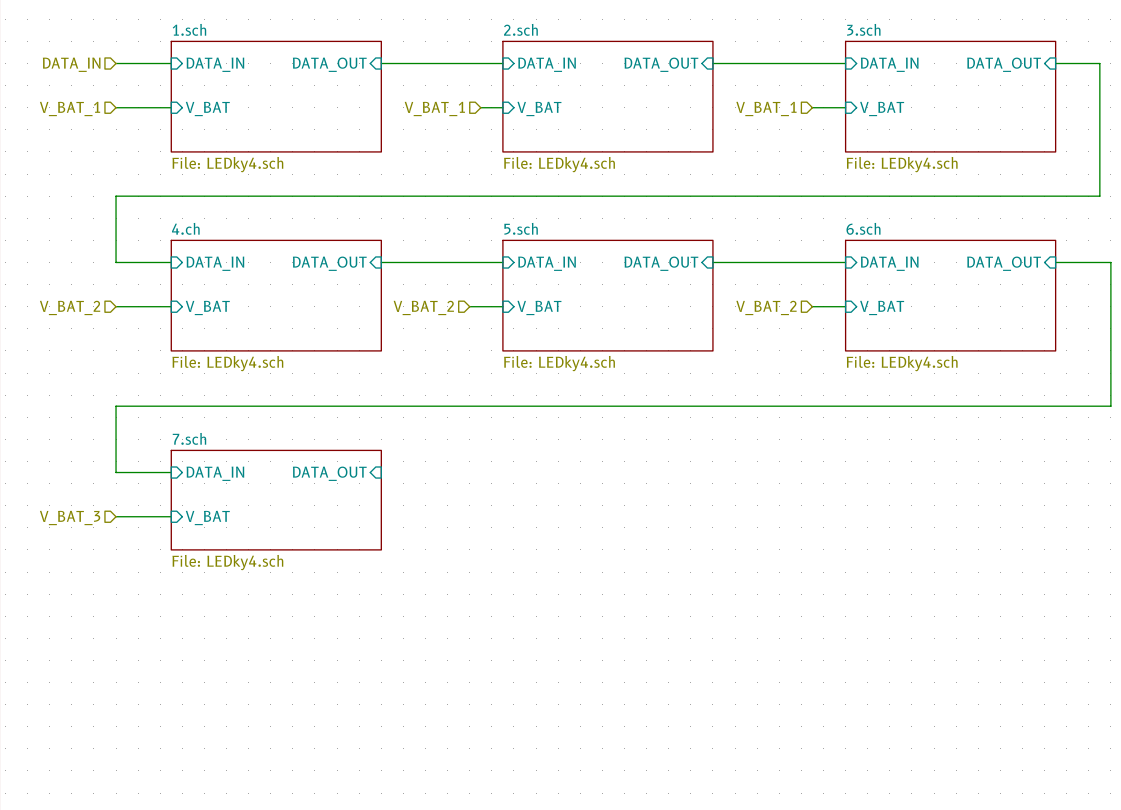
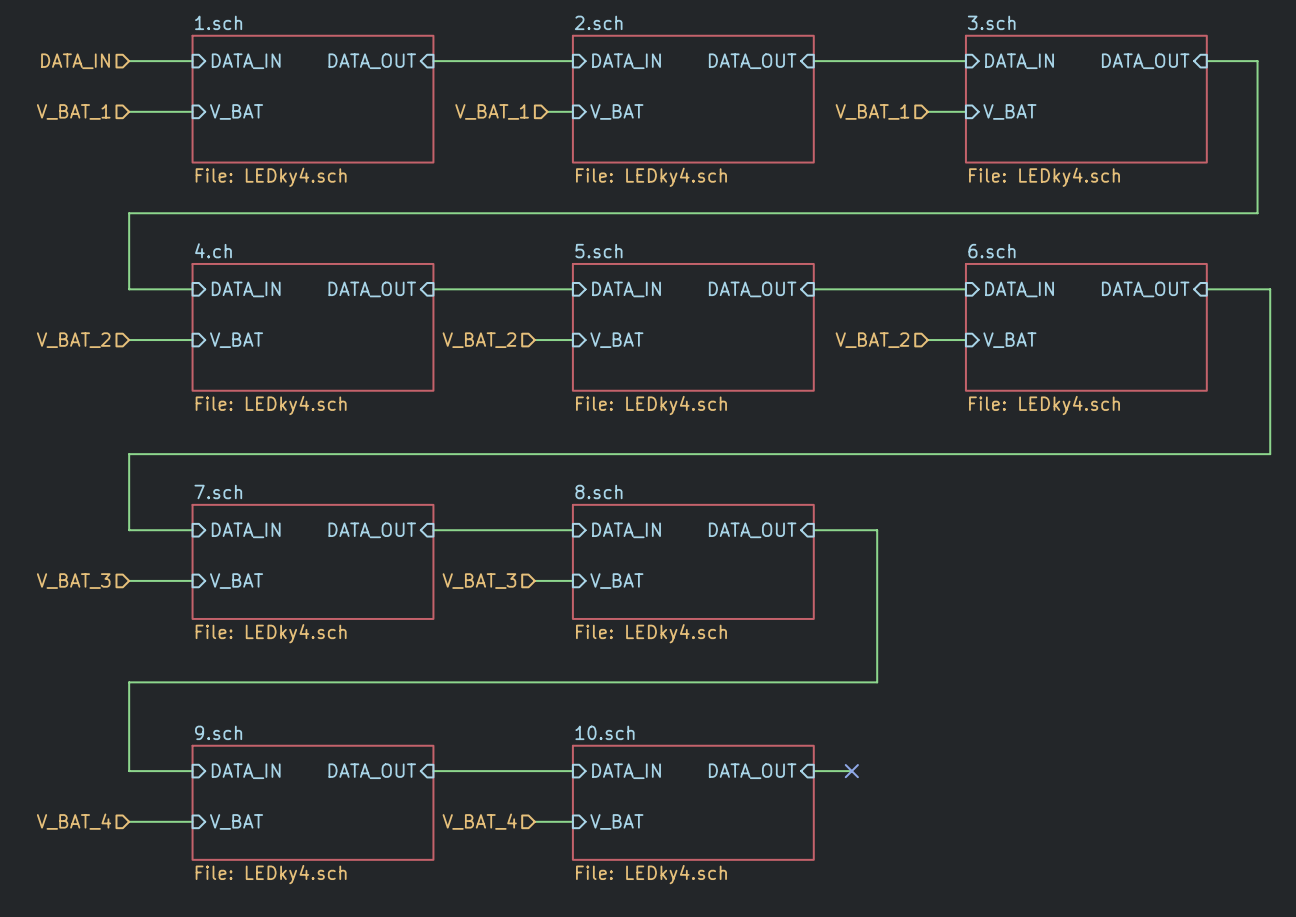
wire: none -> (433, 530) (572, 530)
wire: none -> (813, 530) (877, 530) (877, 682) (129, 682) (129, 771) (192, 771)
sheet pin: none -> DATA_IN (626, 530)
sheet pin: none -> DATA_OUT (752, 530)
sheet 8.sch: none -> File: LEDky4.sch (693, 561)
wire: none -> (534, 580) (572, 580)
hierarchical label: none -> V_BAT_3 (479, 581)
sheet pin: none -> V_BAT (616, 581)
wire: none -> (433, 771) (572, 771)
wire: none -> (813, 771) (851, 771)
no-connect mark: none -> (851, 771)
sheet pin: none -> DATA_IN (246, 771)
sheet pin: none -> DATA_OUT (372, 771)
sheet pin: none -> DATA_IN (626, 771)
sheet pin: none -> DATA_OUT (752, 771)
sheet 9.sch: none -> File: LEDky4.sch (312, 802)
sheet 10.sch: none -> File: LEDky4.sch (693, 802)
wire: none -> (129, 821) (192, 821)
wire: none -> (534, 821) (572, 821)
hierarchical label: none -> V_BAT_4 (74, 821)
sheet pin: none -> V_BAT (236, 821)
hierarchical label: none -> V_BAT_4 (479, 821)
sheet pin: none -> V_BAT (616, 821)

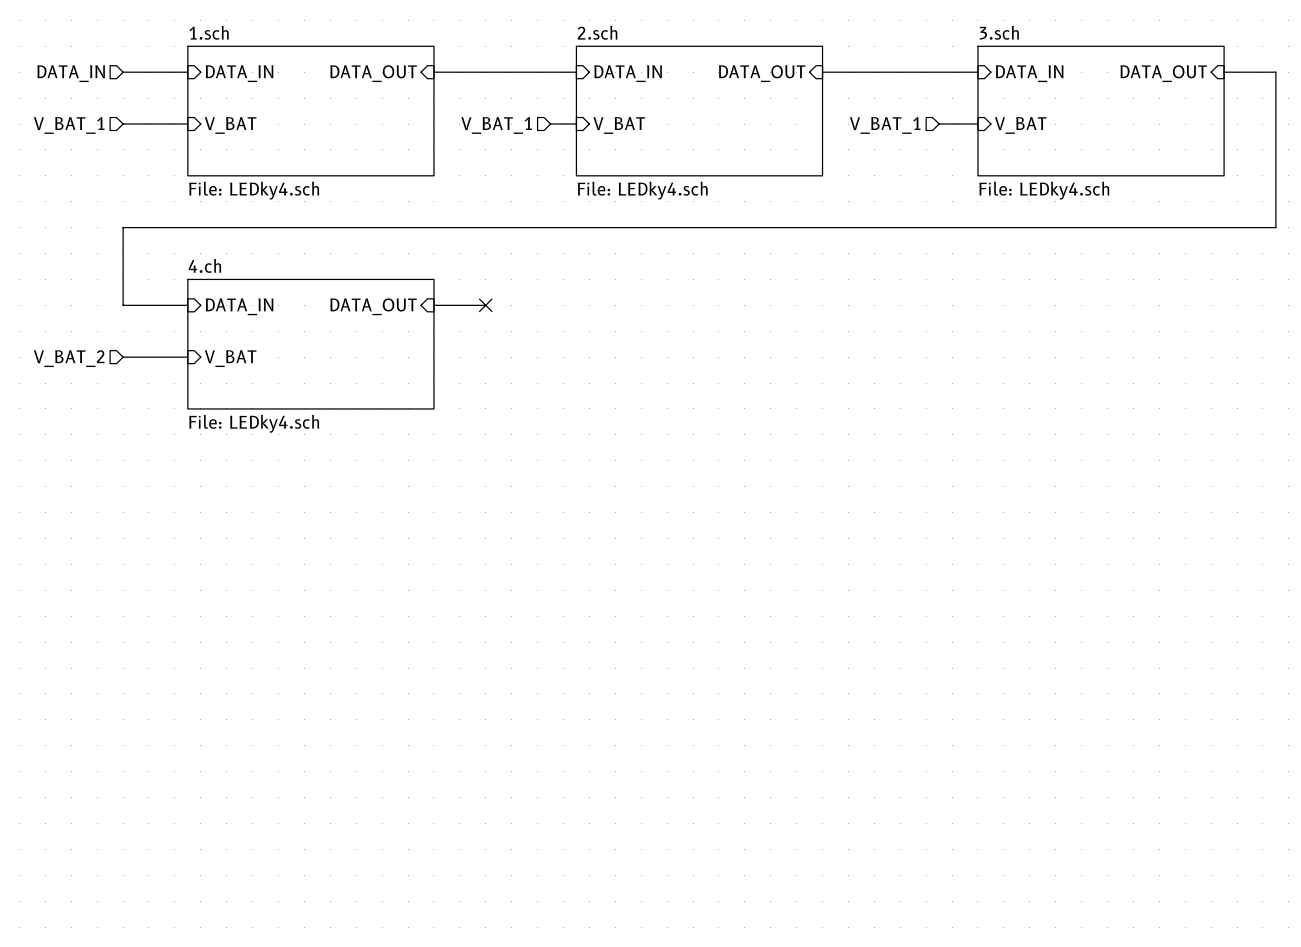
wire: (484, 289) (572, 289) -> none
no-connect mark: none -> (485, 305)
sheet pin: DATA_IN (626, 289) -> none
sheet pin: DATA_OUT (752, 289) -> none
wire: (813, 289) (965, 289) -> none
sheet pin: DATA_IN (1019, 289) -> none
sheet pin: DATA_OUT (1145, 289) -> none
wire: (1206, 289) (1270, 289) (1270, 454) (129, 454) (129, 530) (192, 530) -> none
sheet 5.sch: File: LEDky4.sch (693, 327) -> none
sheet 6.sch: File: LEDky4.sch (1086, 327) -> none
hierarchical label: V_BAT_2 (479, 340) -> none
wire: (534, 340) (572, 340) -> none
sheet pin: V_BAT (616, 340) -> none
hierarchical label: V_BAT_2 (872, 340) -> none
wire: (927, 340) (965, 340) -> none
sheet pin: V_BAT (1009, 340) -> none
sheet pin: DATA_IN (246, 530) -> none
sheet pin: DATA_OUT (372, 530) -> none
wire: (433, 530) (572, 530) -> none
sheet pin: DATA_IN (626, 530) -> none
sheet pin: DATA_OUT (752, 530) -> none
wire: (813, 530) (877, 530) (877, 682) (129, 682) (129, 771) (192, 771) -> none
sheet 7.sch: File: LEDky4.sch (312, 561) -> none
sheet 8.sch: File: LEDky4.sch (693, 561) -> none
wire: (129, 580) (192, 580) -> none
wire: (534, 580) (572, 580) -> none
hierarchical label: V_BAT_3 (73, 581) -> none
sheet pin: V_BAT (236, 581) -> none
hierarchical label: V_BAT_3 (479, 581) -> none
sheet pin: V_BAT (616, 581) -> none
sheet pin: DATA_IN (246, 771) -> none
sheet pin: DATA_OUT (372, 771) -> none
wire: (433, 771) (572, 771) -> none
sheet pin: DATA_IN (626, 771) -> none
sheet pin: DATA_OUT (752, 771) -> none
wire: (813, 771) (851, 771) -> none
no-connect mark: (851, 771) -> none
sheet 9.sch: File: LEDky4.sch (312, 802) -> none
sheet 10.sch: File: LEDky4.sch (693, 802) -> none
hierarchical label: V_BAT_4 (74, 821) -> none
wire: (129, 821) (192, 821) -> none
sheet pin: V_BAT (236, 821) -> none
hierarchical label: V_BAT_4 (479, 821) -> none
wire: (534, 821) (572, 821) -> none
sheet pin: V_BAT (616, 821) -> none

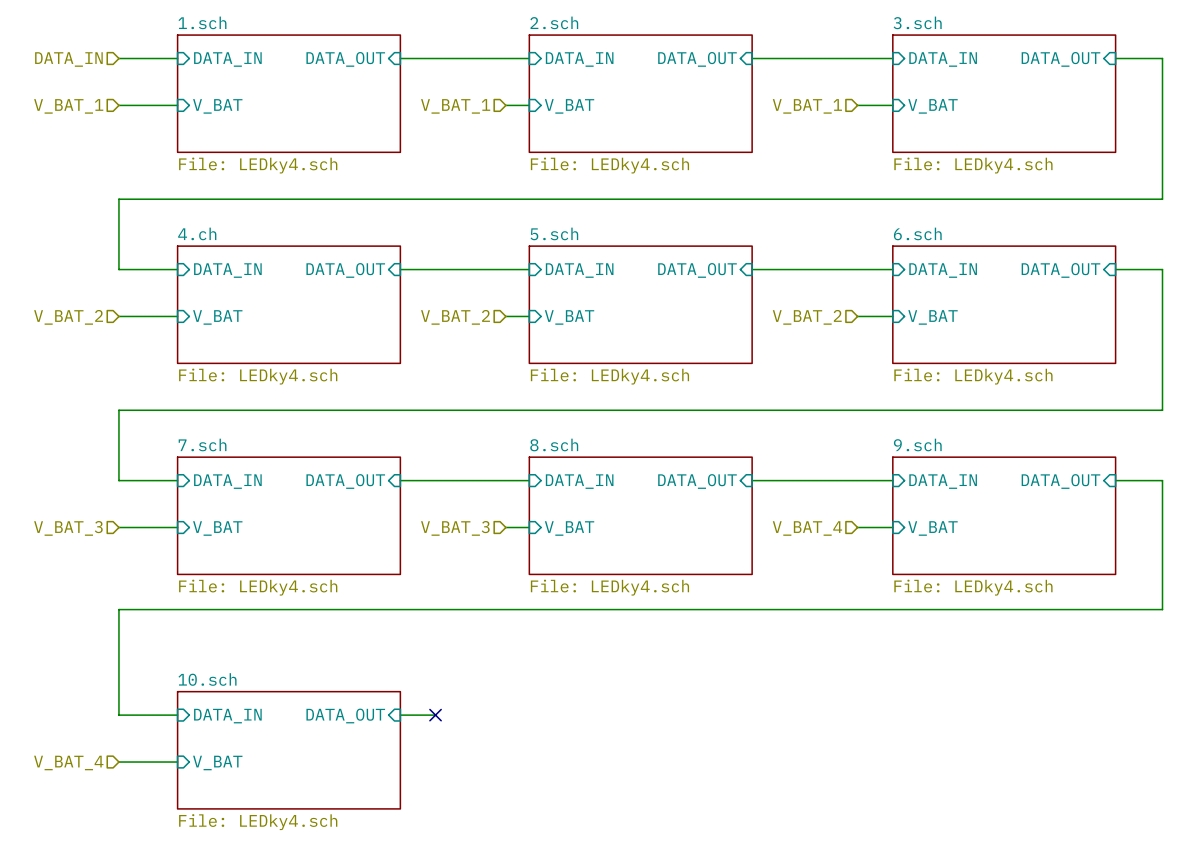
wire: none -> (447, 269) (529, 269)
no-connect mark: (485, 305) -> none
wire: none -> (752, 269) (892, 269)
wire: none -> (1115, 269) (1162, 269) (1162, 410) (118, 410) (118, 480) (177, 480)
sheet pin: none -> DATA_IN (579, 270)
sheet pin: none -> DATA_OUT (697, 270)
sheet pin: none -> DATA_IN (943, 270)
sheet pin: none -> DATA_OUT (1060, 270)
sheet 5.sch: none -> File: LEDky4.sch (640, 304)
sheet 6.sch: none -> File: LEDky4.sch (1004, 304)
wire: none -> (505, 316) (529, 316)
wire: none -> (857, 316) (892, 316)
hierarchical label: none -> V_BAT_2 (455, 317)
sheet pin: none -> V_BAT (569, 317)
hierarchical label: none -> V_BAT_2 (807, 317)
sheet pin: none -> V_BAT (933, 317)
wire: none -> (400, 480) (529, 480)
wire: none -> (752, 480) (892, 480)
wire: none -> (1115, 480) (1162, 480) (1162, 609) (118, 609) (118, 715) (177, 715)
sheet pin: none -> DATA_IN (227, 481)
sheet pin: none -> DATA_OUT (345, 481)
sheet pin: none -> DATA_IN (579, 481)
sheet pin: none -> DATA_OUT (697, 481)
sheet pin: none -> DATA_IN (943, 481)
sheet pin: none -> DATA_OUT (1060, 481)
sheet 7.sch: none -> File: LEDky4.sch (288, 515)
sheet 8.sch: none -> File: LEDky4.sch (640, 515)
sheet 9.sch: none -> File: LEDky4.sch (1004, 515)
wire: none -> (118, 527) (177, 527)
wire: none -> (505, 527) (529, 527)
wire: none -> (857, 527) (892, 527)
hierarchical label: none -> V_BAT_3 (68, 528)
sheet pin: none -> V_BAT (217, 528)
hierarchical label: none -> V_BAT_3 (455, 528)
sheet pin: none -> V_BAT (569, 528)
hierarchical label: none -> V_BAT_4 (807, 528)
sheet pin: none -> V_BAT (933, 528)
wire: none -> (400, 715) (435, 715)
no-connect mark: none -> (435, 715)
sheet pin: none -> DATA_IN (227, 716)
sheet pin: none -> DATA_OUT (345, 715)
sheet 10.sch: none -> File: LEDky4.sch (288, 750)
wire: none -> (118, 762) (177, 762)
hierarchical label: none -> V_BAT_4 (68, 762)
sheet pin: none -> V_BAT (217, 762)

